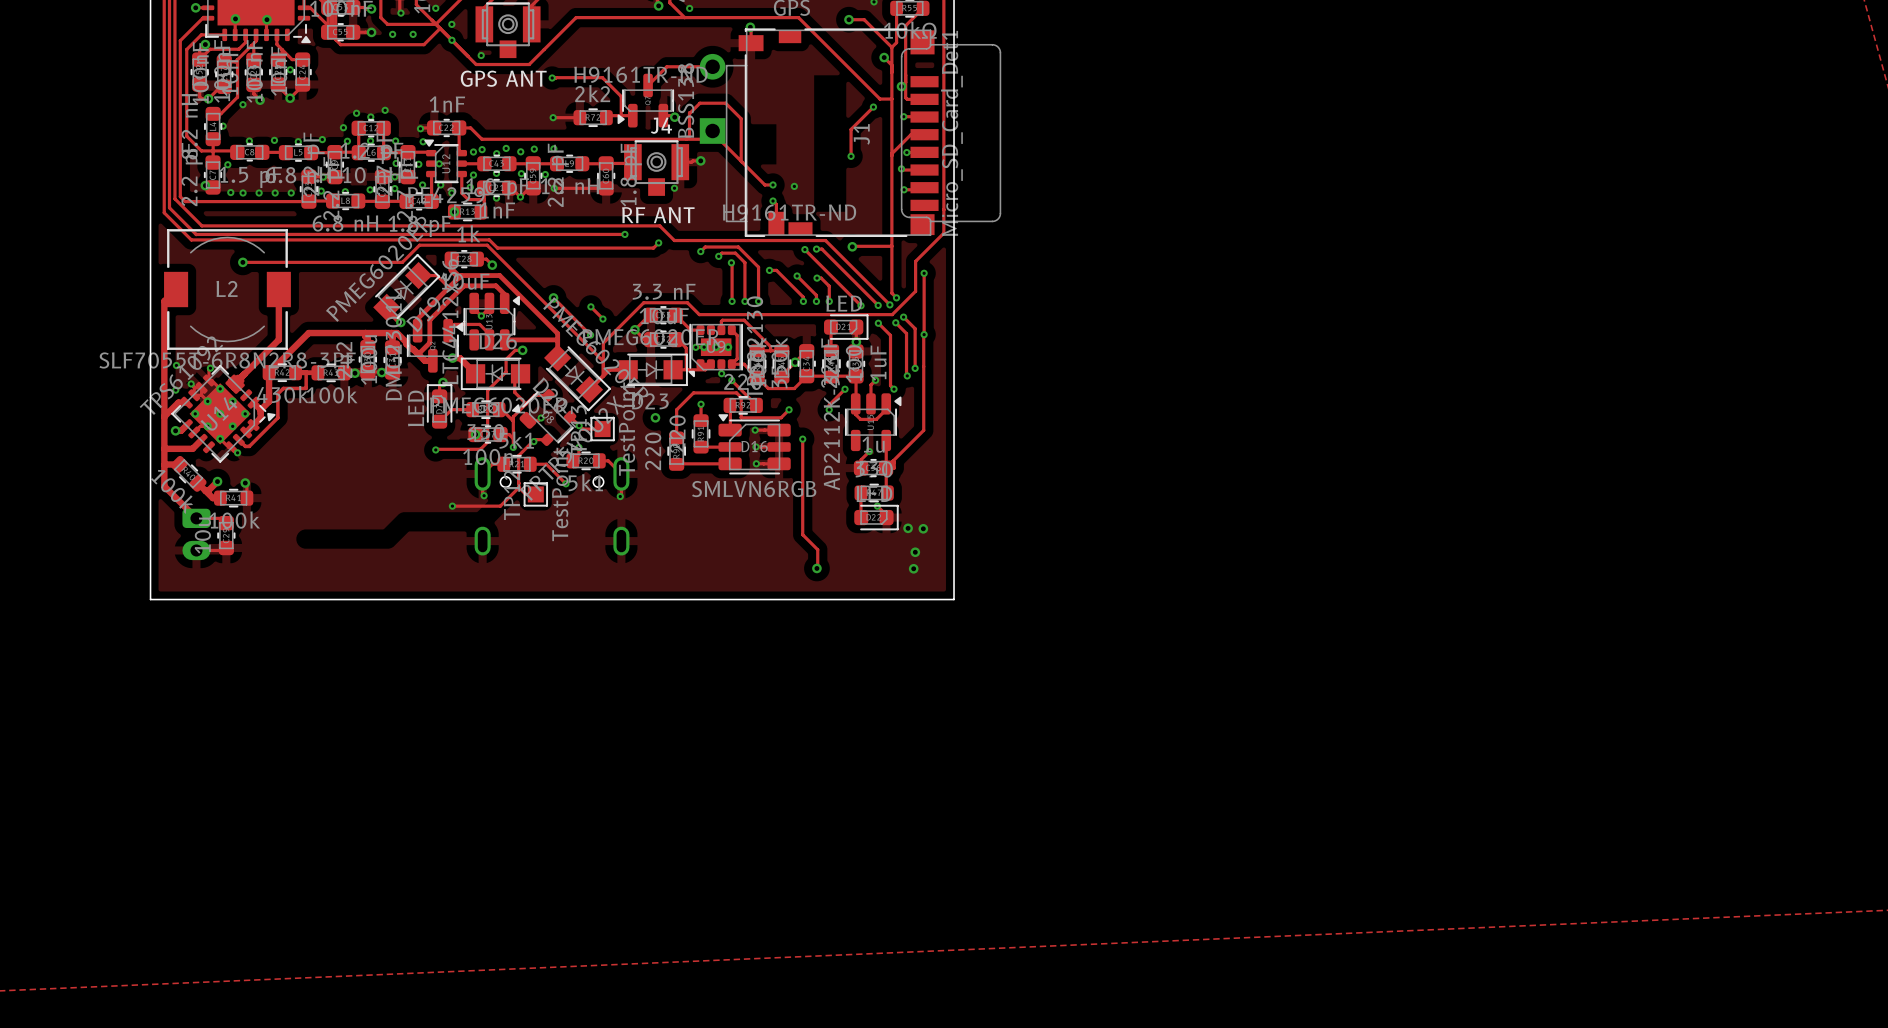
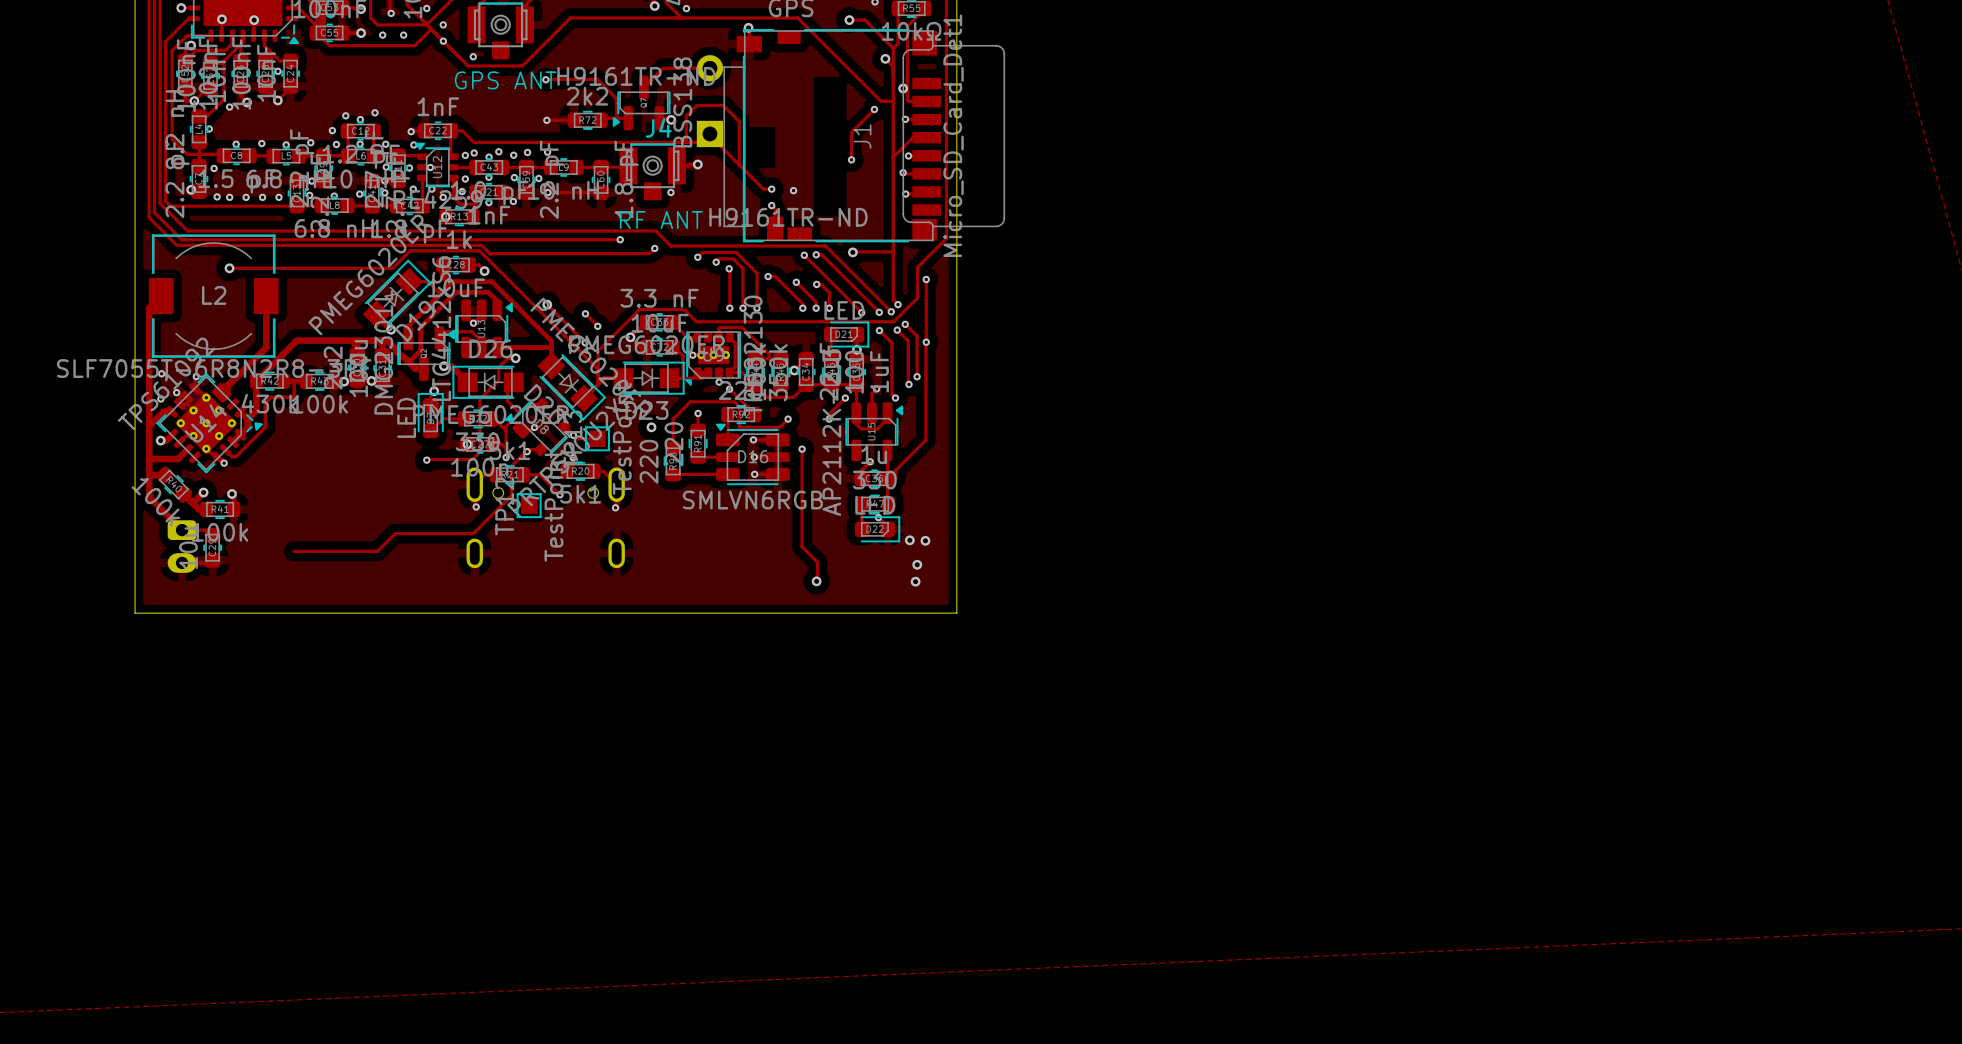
track: none -> (511, 495) (473, 533) (395, 533) (377, 551) (294, 551)
track: (518, 487) (500, 506) (452, 506) -> none
via: (452, 506) -> none

